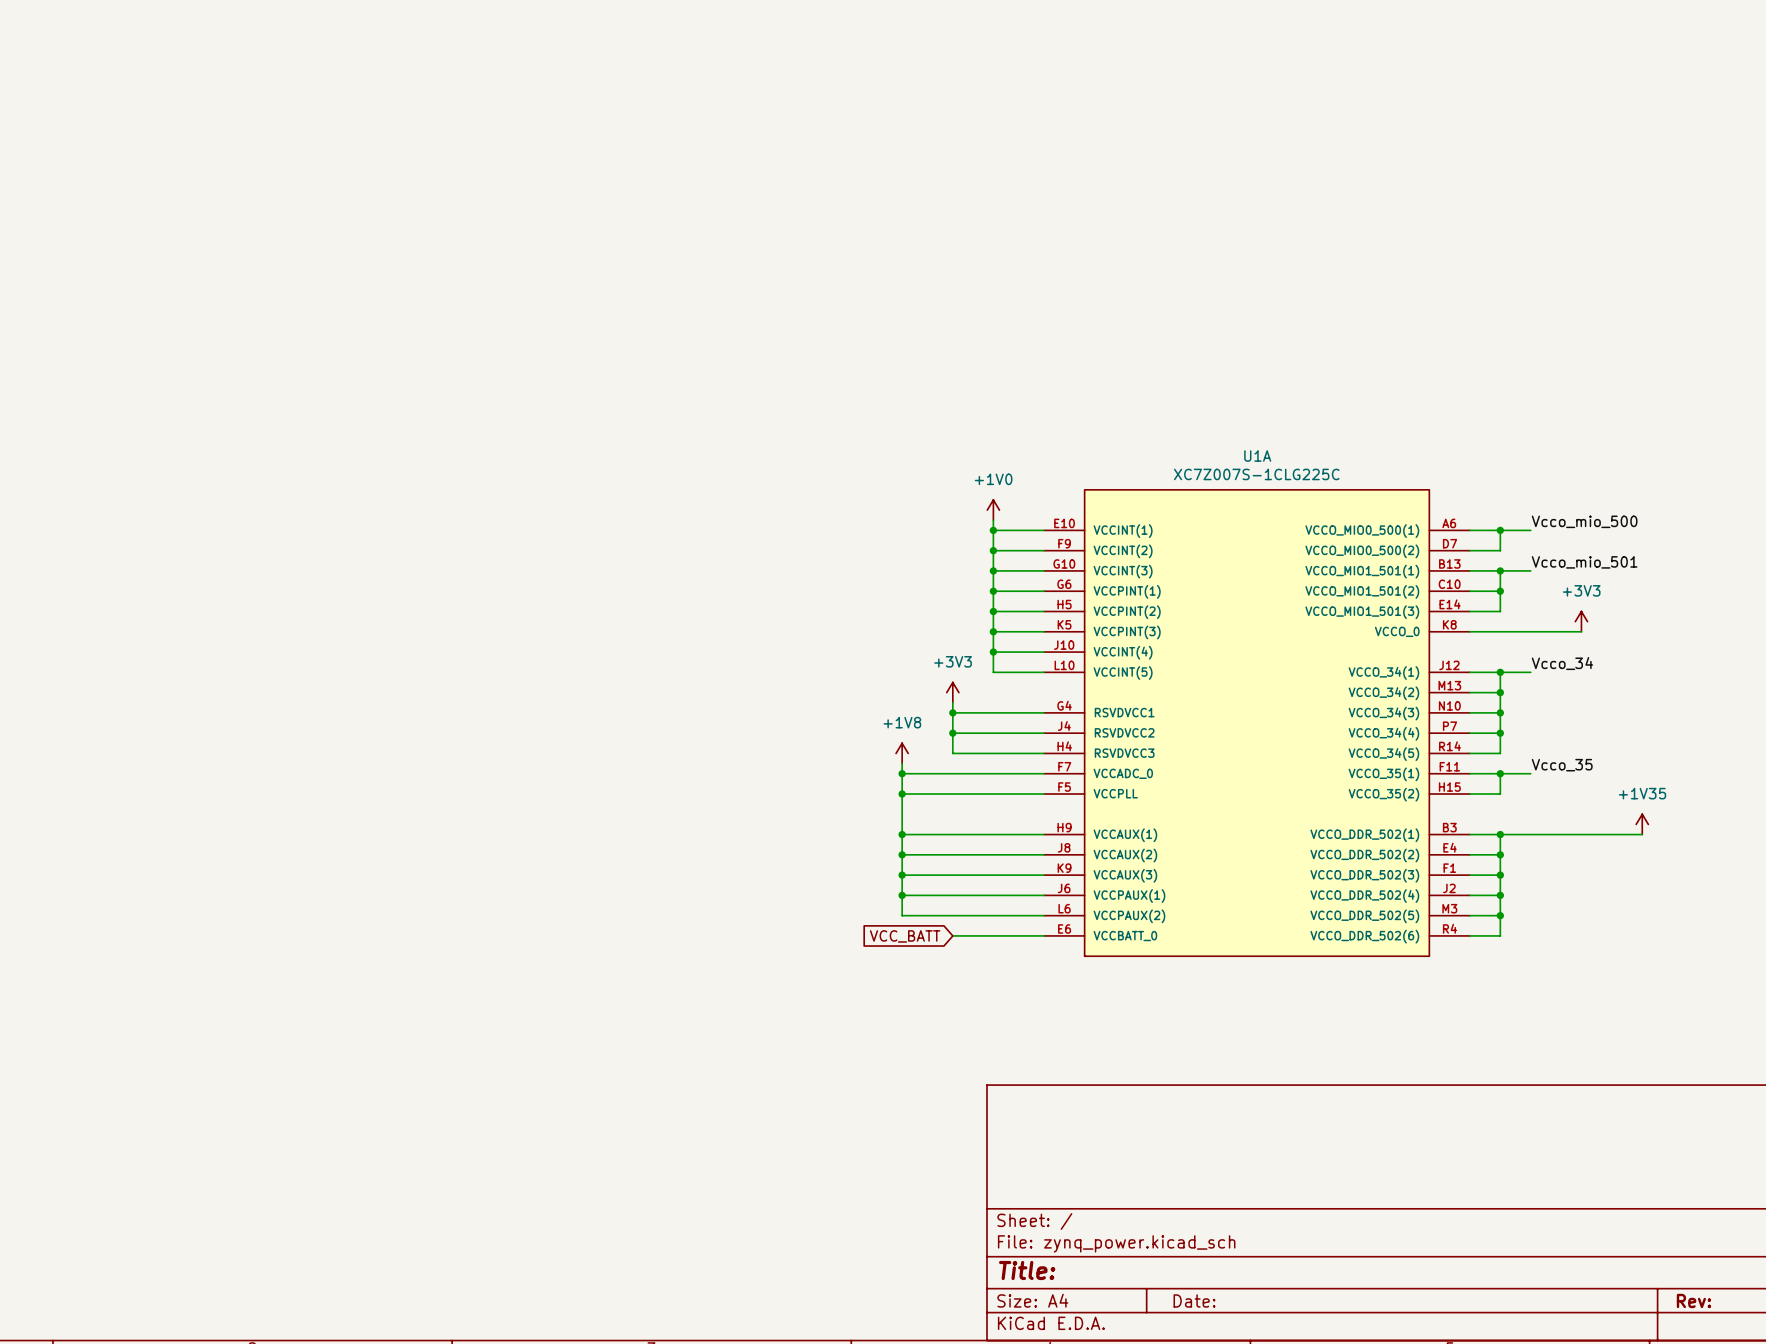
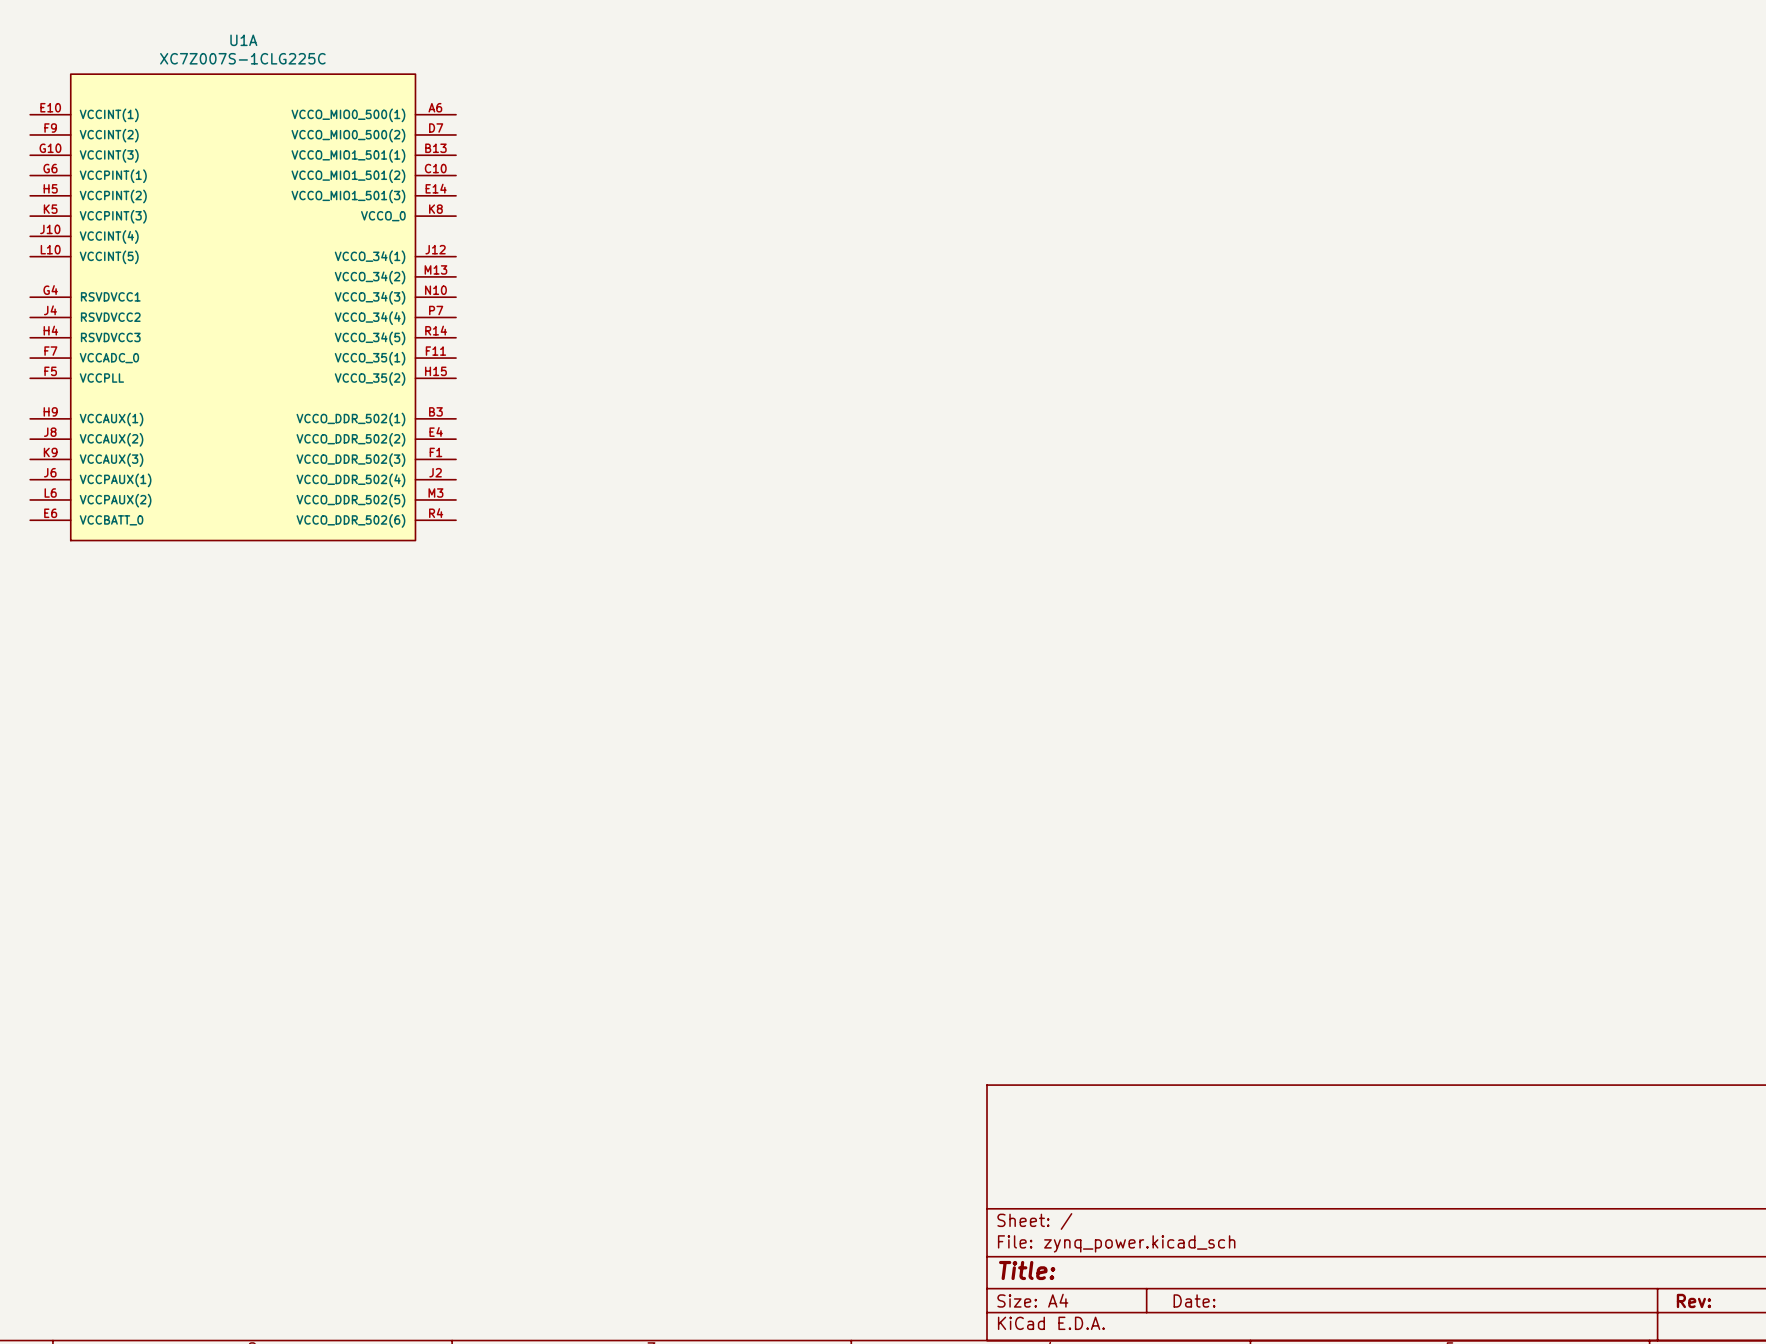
power symbol: +1V0 (993, 510) -> none
wire: (993, 520) (993, 672) (1044, 672) -> none
label: Vcco_mio_500 (1584, 521) -> none
wire: (993, 530) (1044, 530) -> none
junction: (993, 530) -> none
wire: (1469, 530) (1530, 530) -> none
wire: (1500, 530) (1500, 550) (1469, 550) -> none
junction: (1500, 530) -> none
wire: (993, 550) (1044, 550) -> none
junction: (993, 550) -> none
label: Vcco_mio_501 (1584, 562) -> none
wire: (993, 570) (1044, 570) -> none
junction: (993, 570) -> none
wire: (1469, 570) (1530, 570) -> none
wire: (1500, 570) (1500, 611) (1469, 611) -> none
junction: (1500, 570) -> none
wire: (993, 591) (1044, 591) -> none
junction: (993, 591) -> none
wire: (1469, 591) (1500, 591) -> none
junction: (1500, 591) -> none
wire: (993, 611) (1044, 611) -> none
junction: (993, 611) -> none
power symbol: +3V3 (1581, 621) -> none
wire: (993, 631) (1044, 631) -> none
junction: (993, 631) -> none
wire: (1469, 631) (1581, 631) -> none
wire: (993, 652) (1044, 652) -> none
junction: (993, 652) -> none
label: Vcco_34 (1562, 663) -> none
wire: (1469, 672) (1530, 672) -> none
wire: (1500, 672) (1500, 753) (1469, 753) -> none
junction: (1500, 672) -> none
power symbol: +3V3 (952, 692) -> none
wire: (1469, 692) (1500, 692) -> none
junction: (1500, 692) -> none
wire: (952, 702) (952, 753) (1044, 753) -> none
wire: (952, 712) (1044, 712) -> none
junction: (952, 712) -> none
wire: (1469, 712) (1500, 712) -> none
junction: (1500, 712) -> none
U1A position: (1256, 723) -> (243, 307)
wire: (952, 733) (1044, 733) -> none
junction: (952, 733) -> none
wire: (1469, 733) (1500, 733) -> none
junction: (1500, 733) -> none
power symbol: +1V8 (902, 753) -> none
wire: (902, 763) (902, 915) (1044, 915) -> none
label: Vcco_35 (1562, 765) -> none
wire: (902, 773) (1044, 773) -> none
junction: (902, 773) -> none
wire: (1469, 773) (1530, 773) -> none
wire: (1500, 773) (1500, 794) (1469, 794) -> none
junction: (1500, 773) -> none
wire: (902, 794) (1044, 794) -> none
junction: (902, 794) -> none
power symbol: +1V35 (1642, 824) -> none
wire: (902, 834) (1044, 834) -> none
junction: (902, 834) -> none
wire: (1469, 834) (1642, 834) -> none
wire: (1500, 834) (1500, 935) (1469, 935) -> none
junction: (1500, 834) -> none
wire: (902, 854) (1044, 854) -> none
junction: (902, 854) -> none
wire: (1469, 854) (1500, 854) -> none
junction: (1500, 854) -> none
wire: (902, 875) (1044, 875) -> none
junction: (902, 875) -> none
wire: (1469, 875) (1500, 875) -> none
junction: (1500, 875) -> none
wire: (902, 895) (1044, 895) -> none
junction: (902, 895) -> none
wire: (1469, 895) (1500, 895) -> none
junction: (1500, 895) -> none
wire: (1469, 915) (1500, 915) -> none
junction: (1500, 915) -> none
wire: (952, 935) (1044, 935) -> none
global label: VCC_BATT (905, 936) -> none

